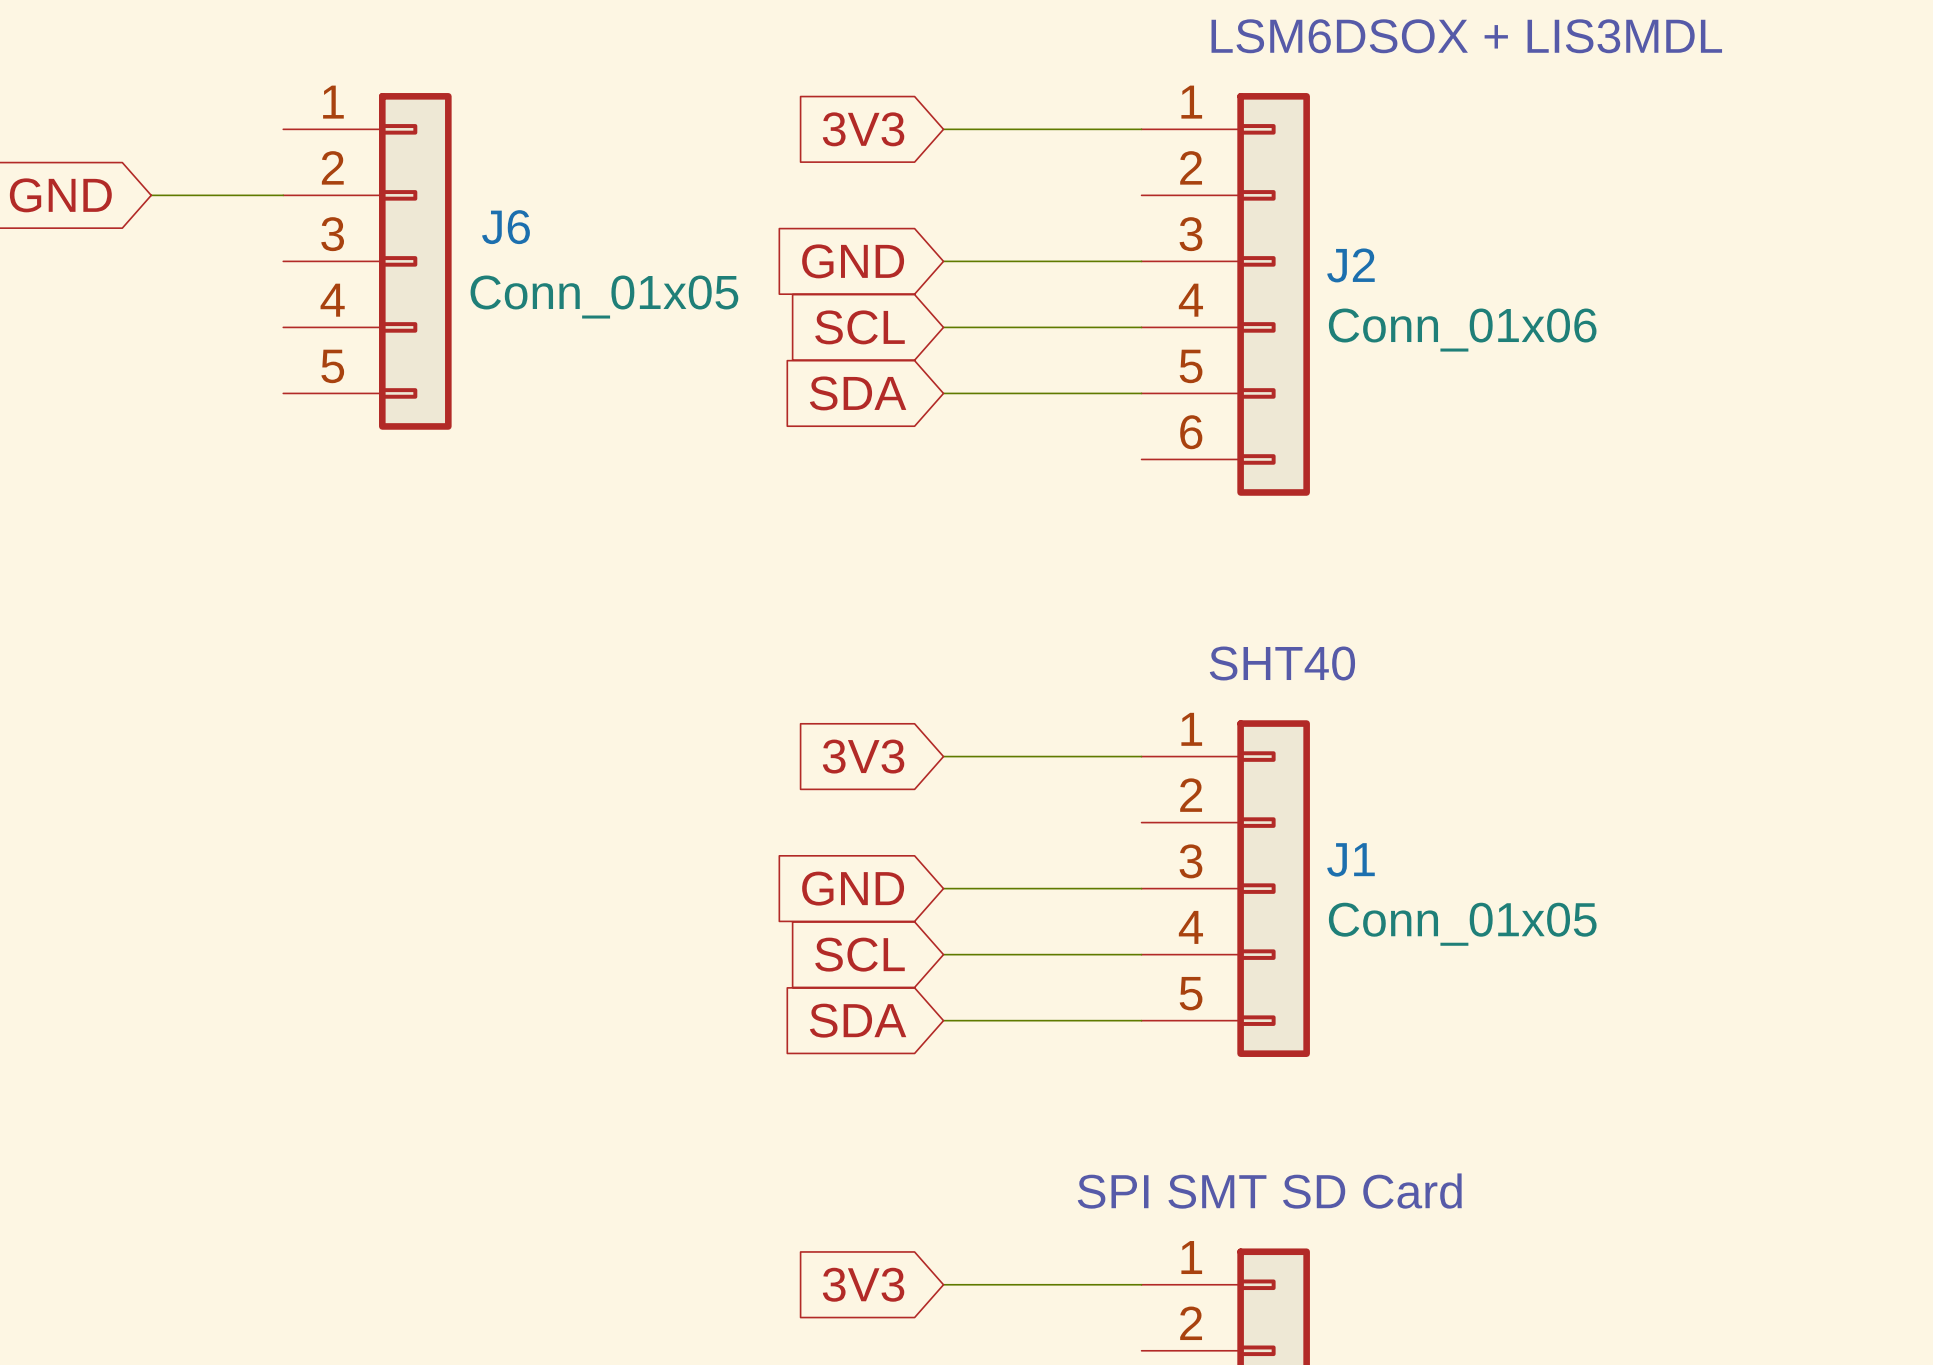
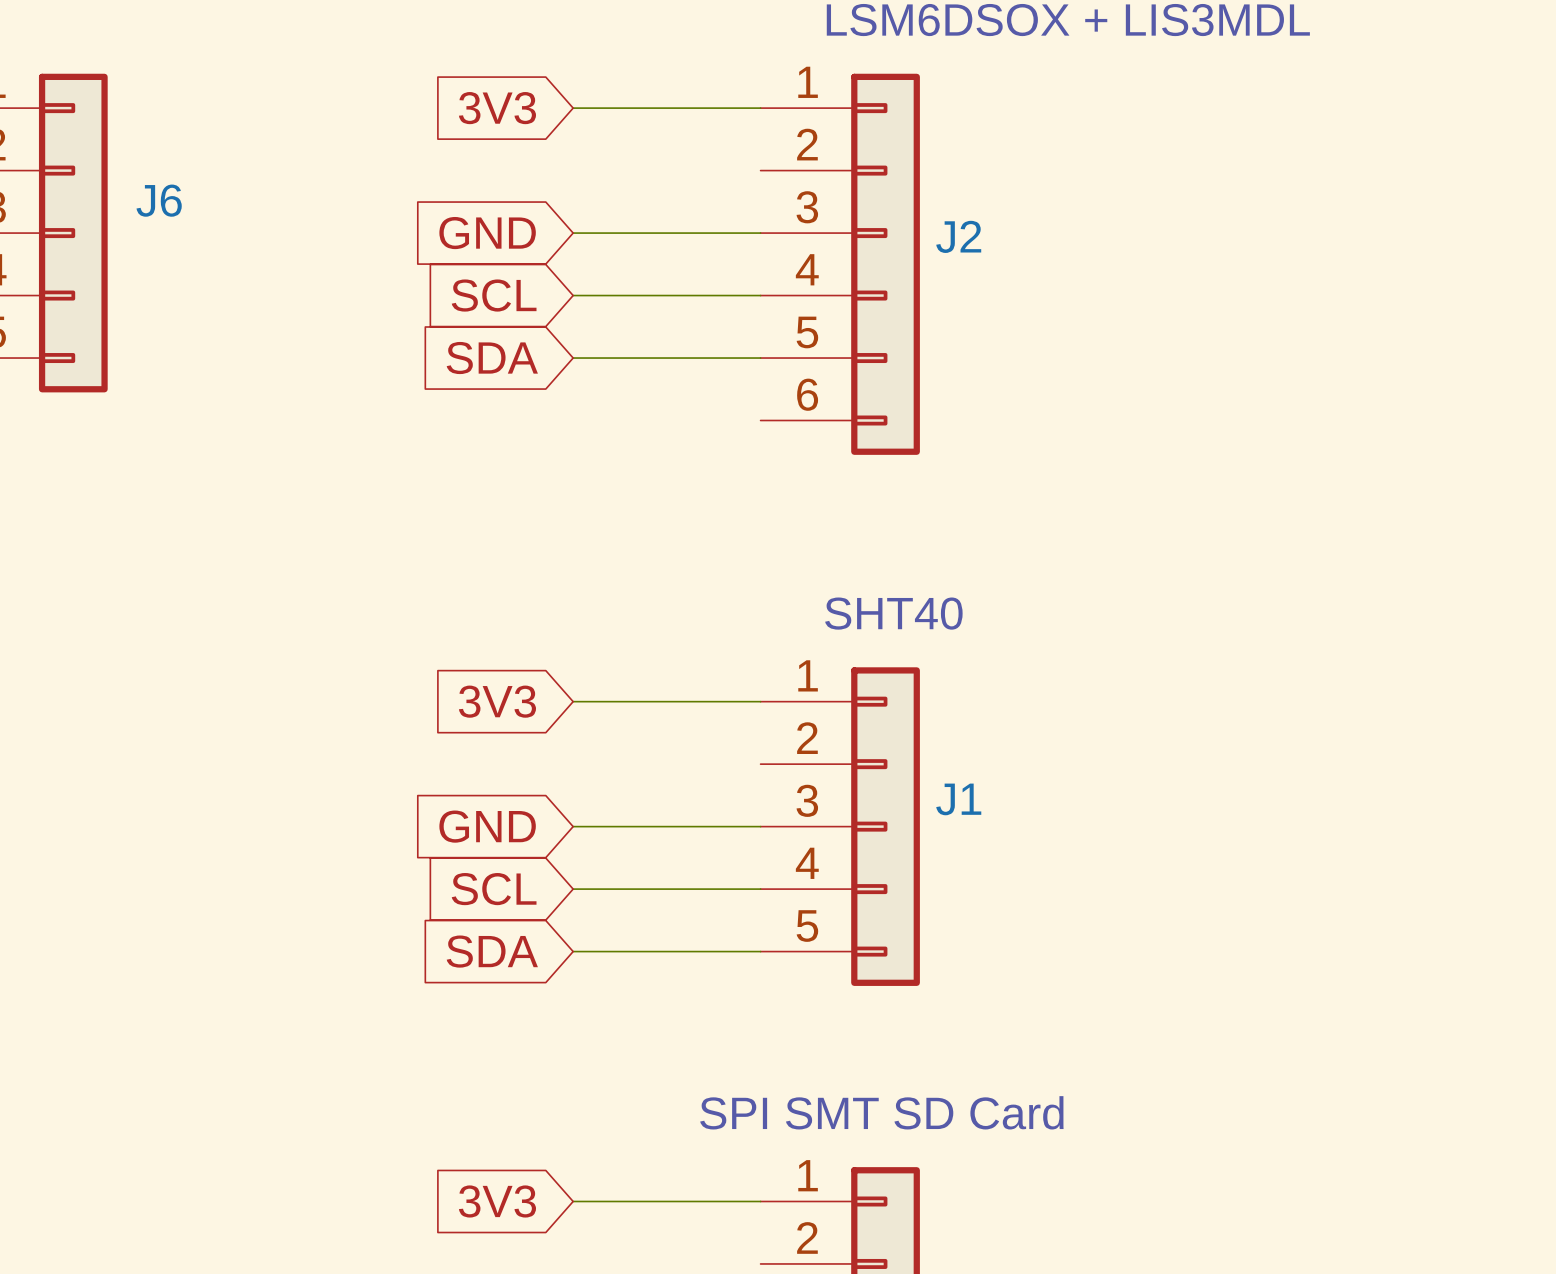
J6 value: Conn_01x05 (604, 297) -> none
J2 value: Conn_01x06 (1462, 330) -> none
J1 value: Conn_01x05 (1462, 924) -> none

